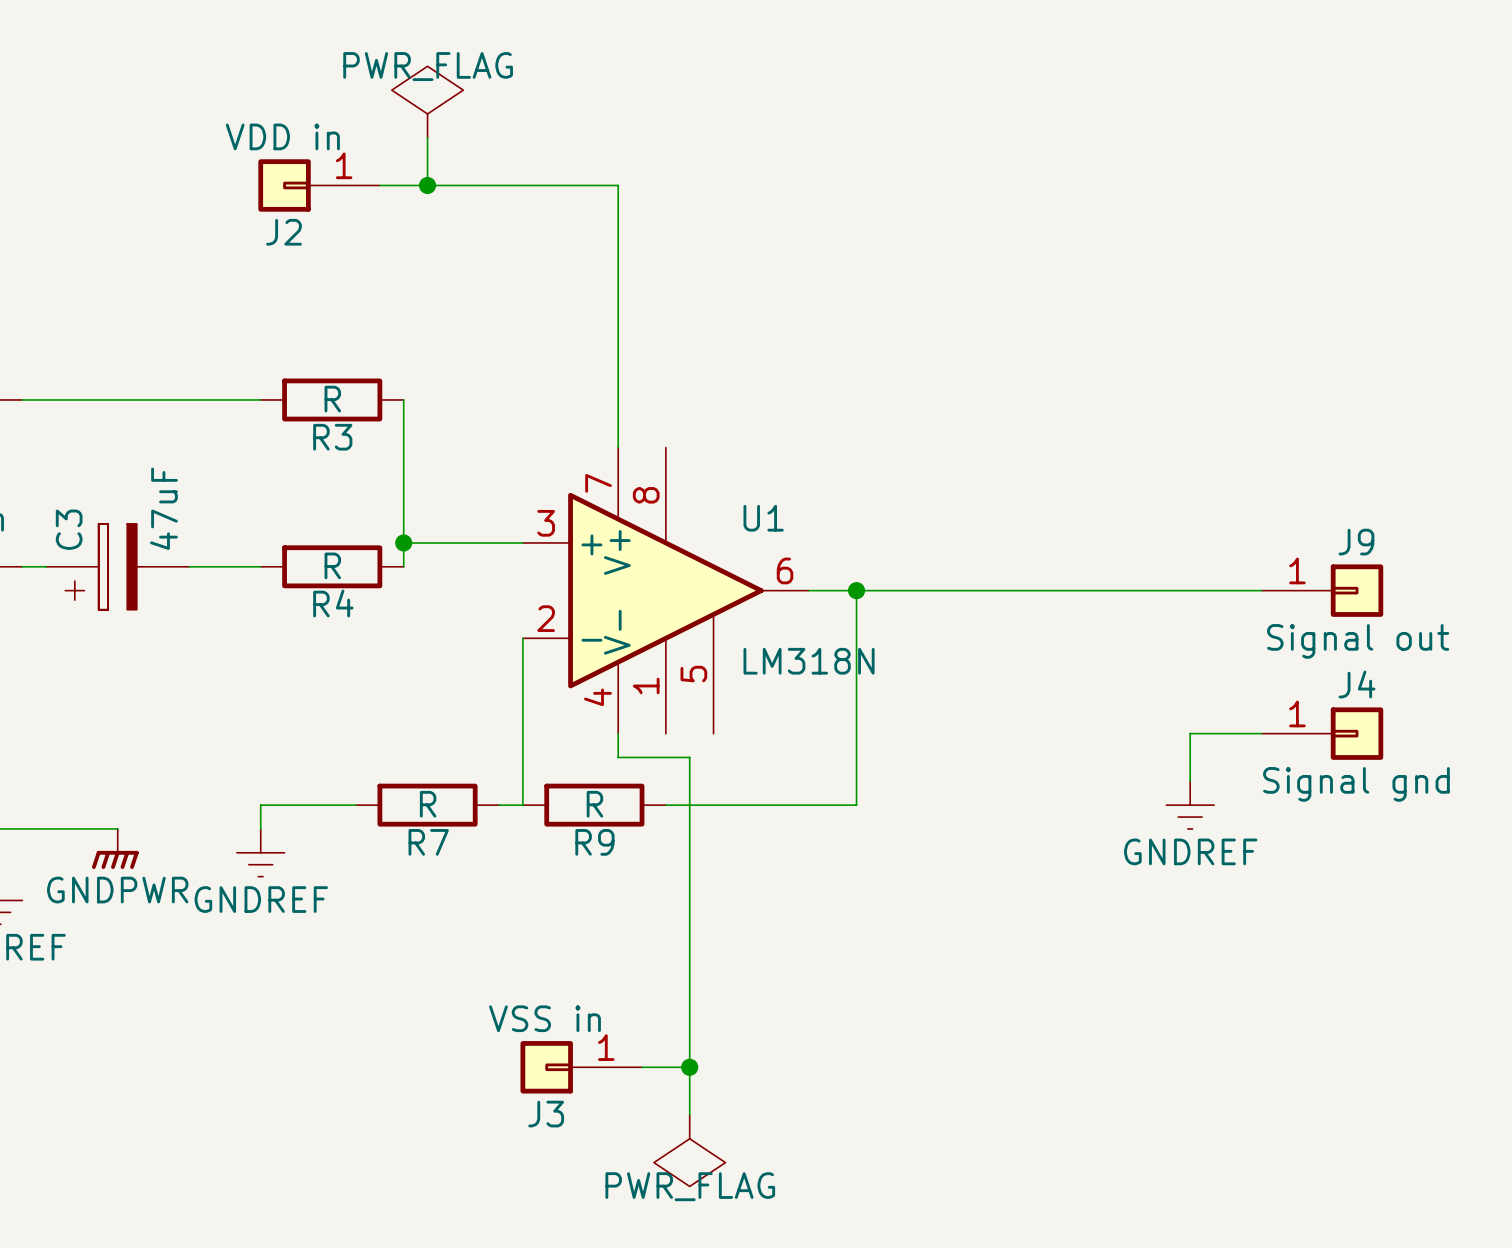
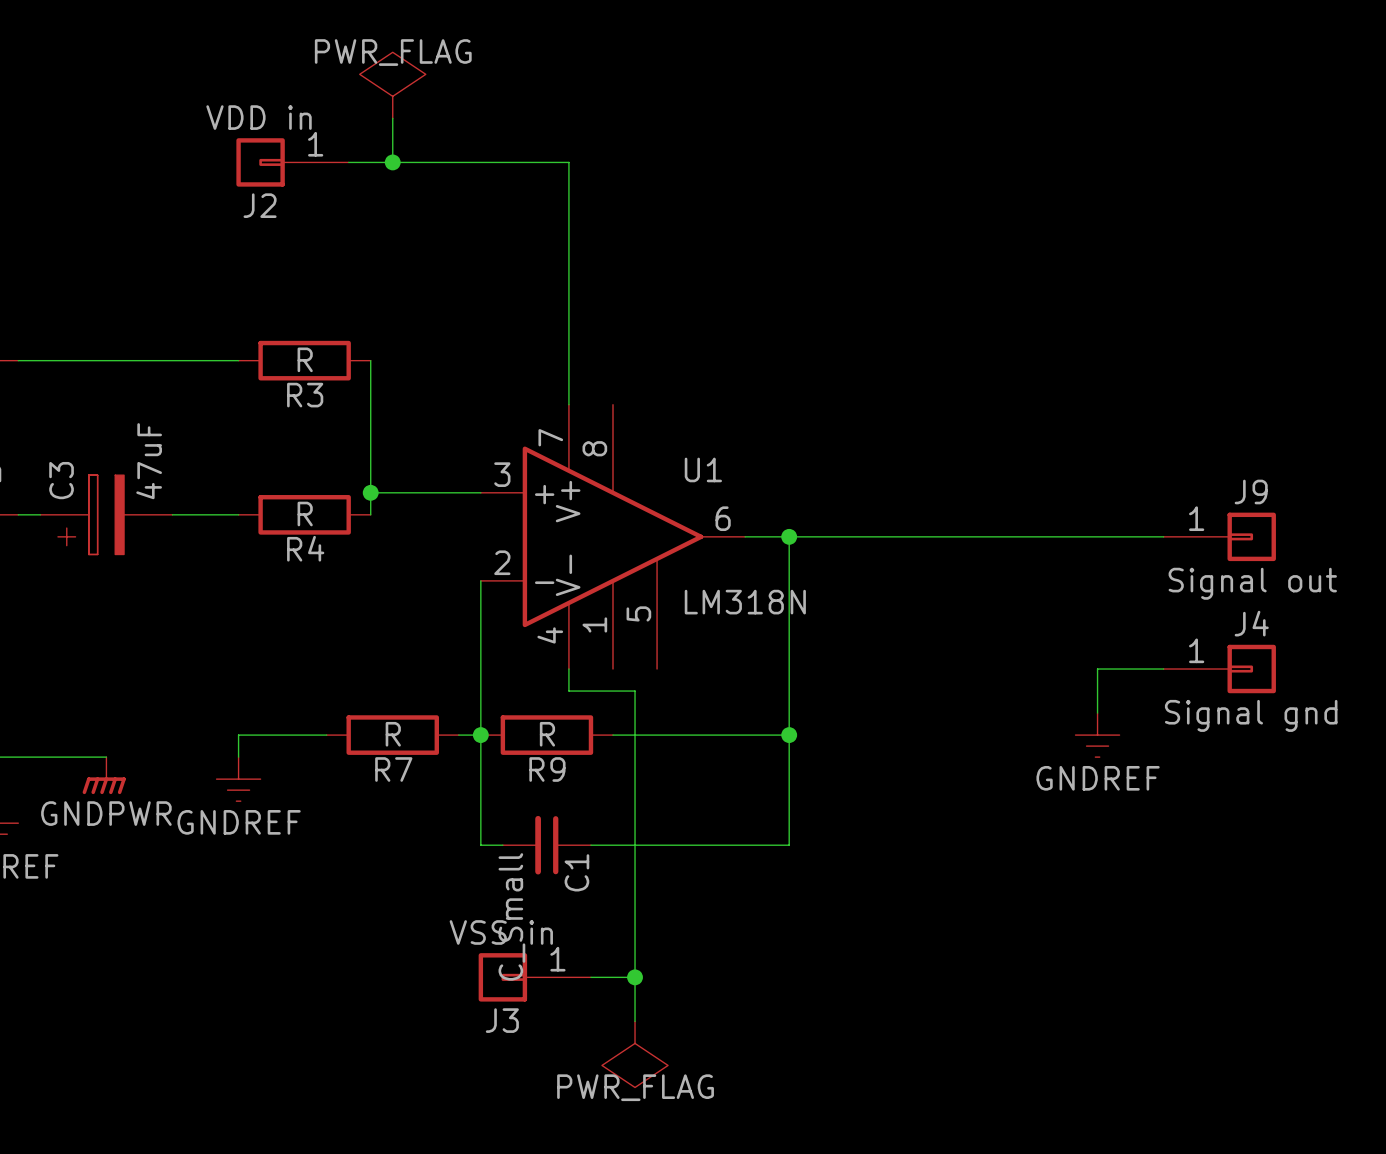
wire: none -> (480, 735) (480, 845) (502, 845)
junction: none -> (480, 735)
wire: none -> (789, 735) (789, 845) (590, 845)
junction: none -> (789, 735)
C1: none -> C_Small (546, 845)

